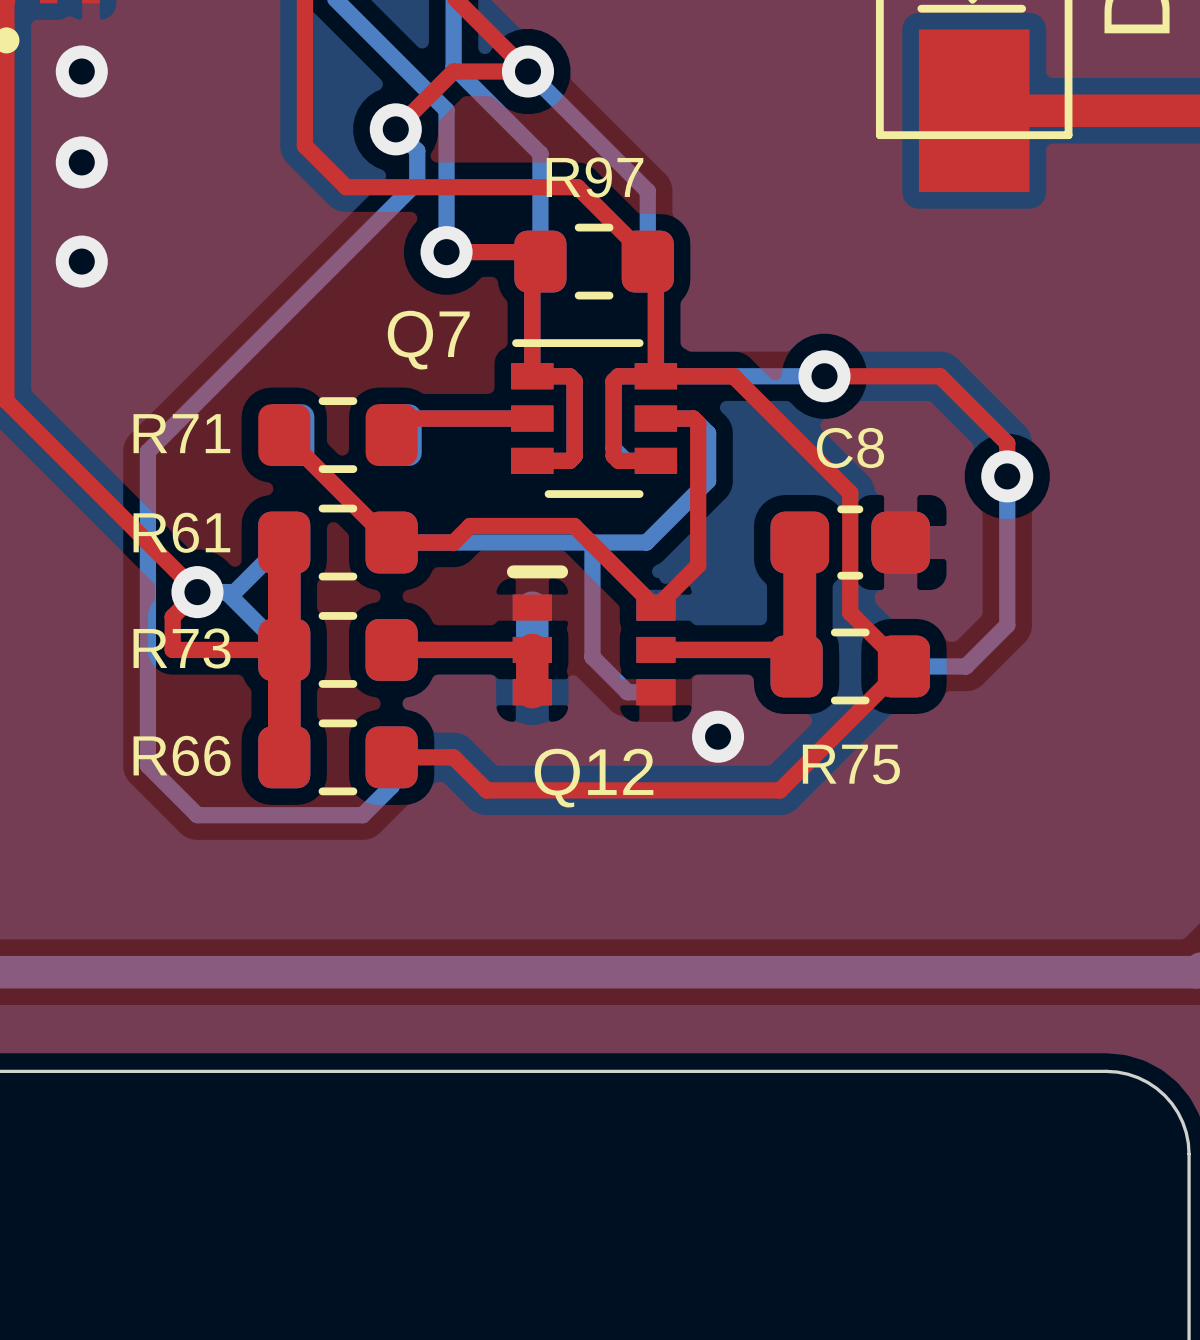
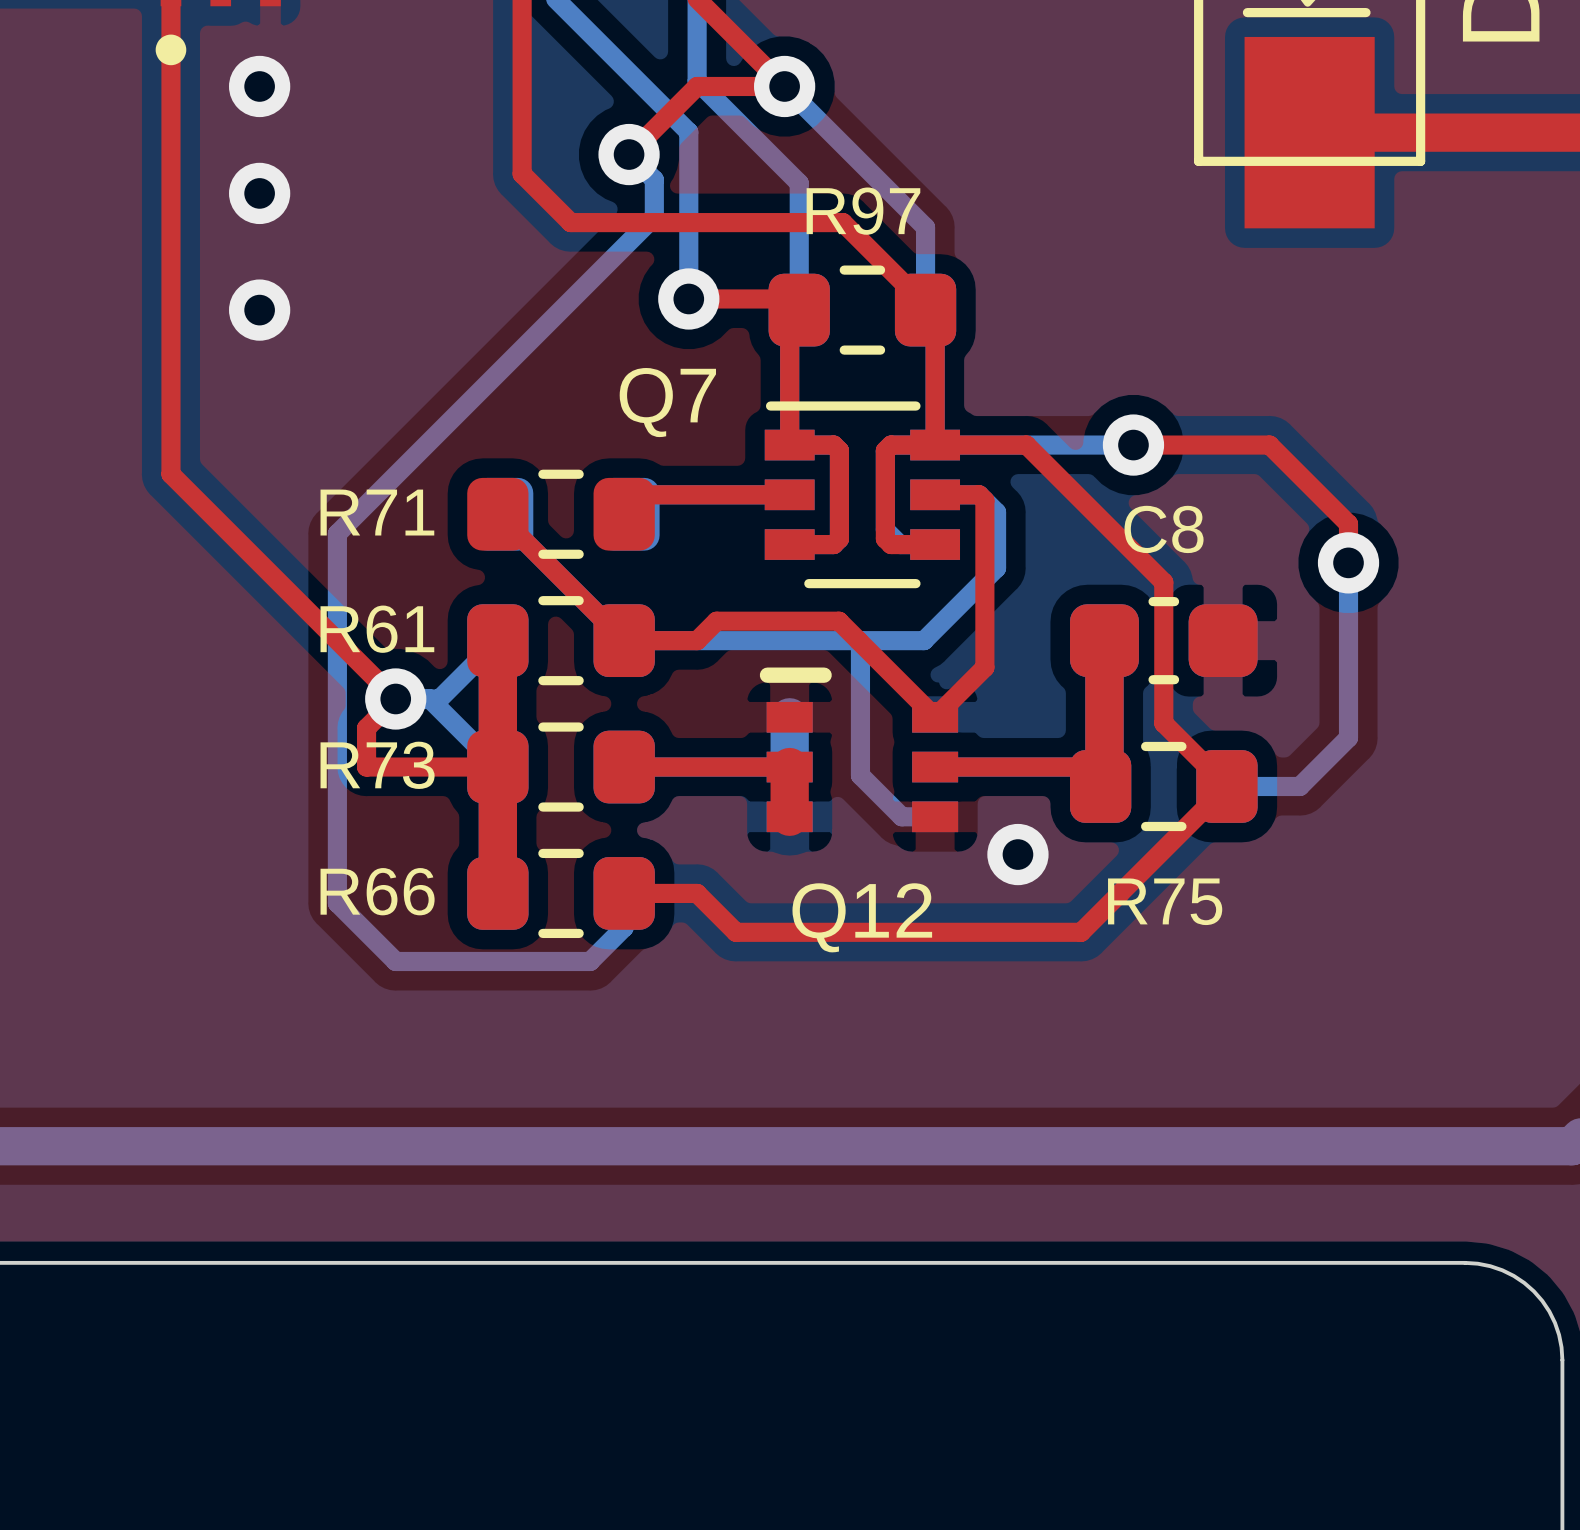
via position: (718, 736) -> (1017, 854)

